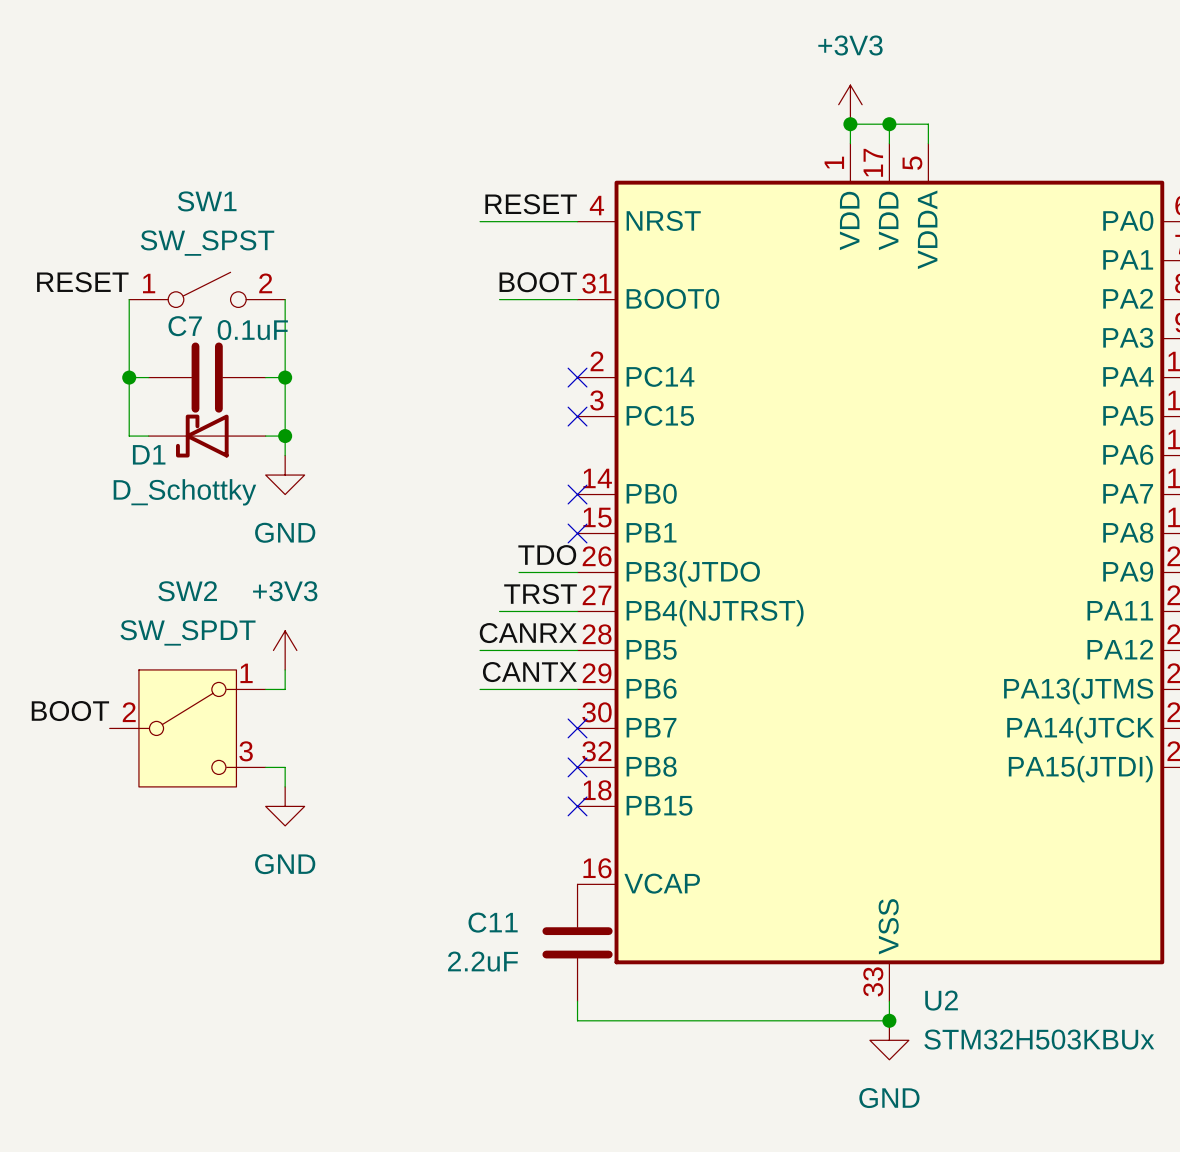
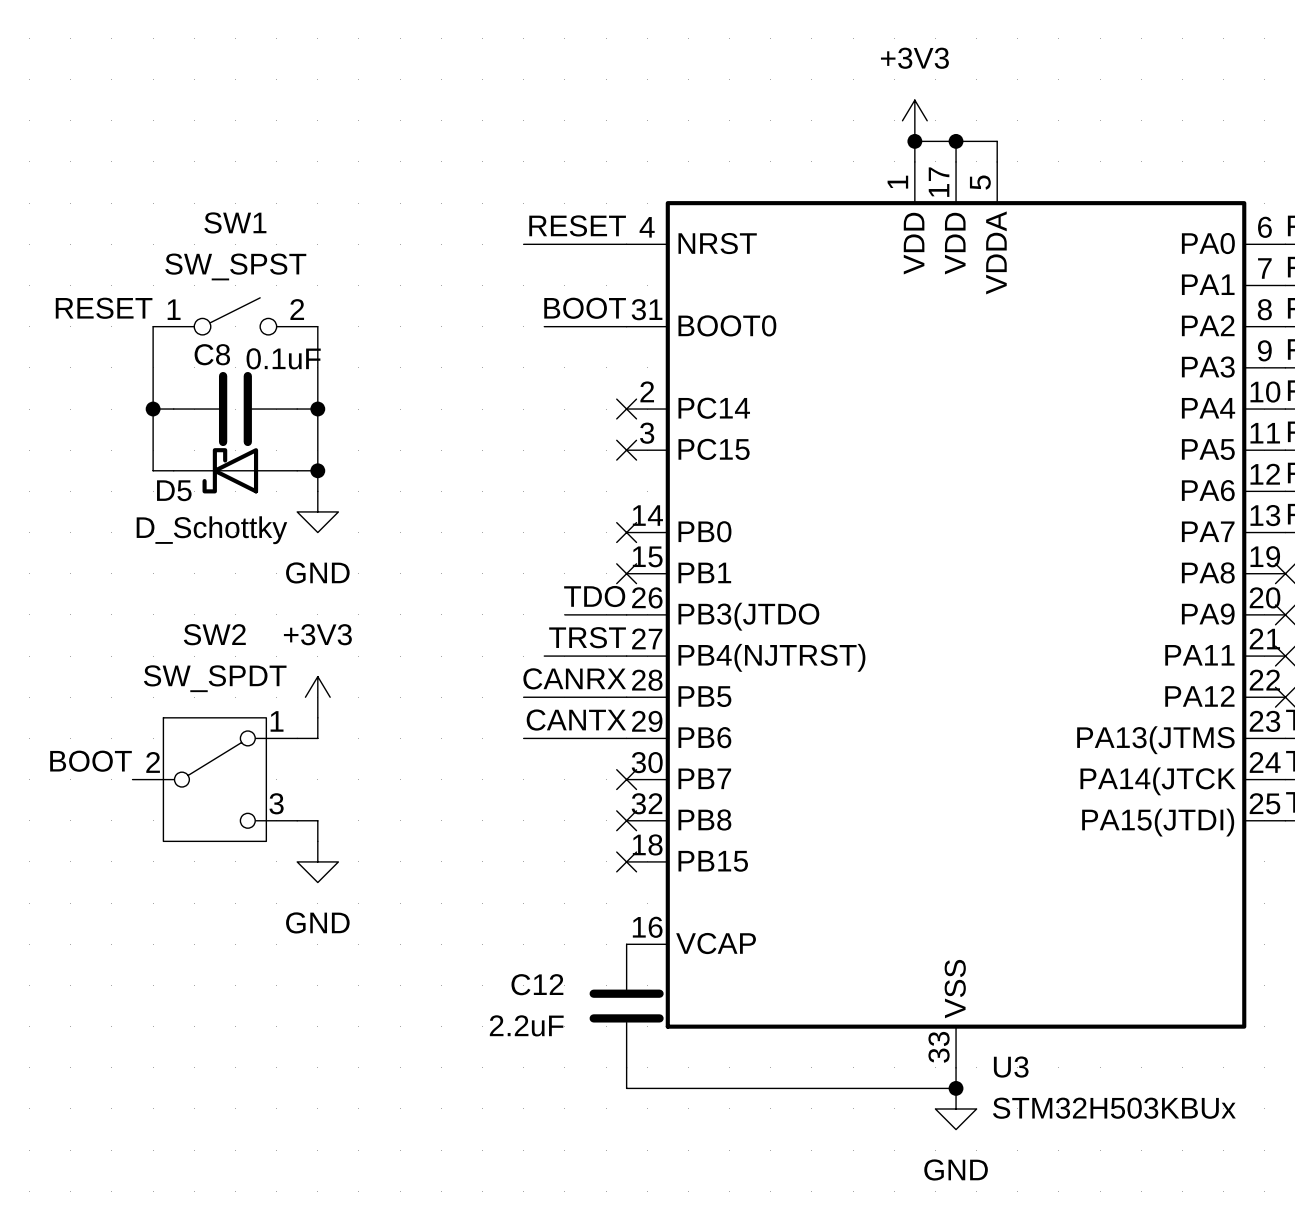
C7 name: C7 (185, 326) -> C8 (212, 354)
D1 name: D1 (149, 454) -> D5 (174, 490)
C11 name: C11 (493, 922) -> C12 (537, 984)
U2 name: U2 (941, 1000) -> U3 (1011, 1067)

